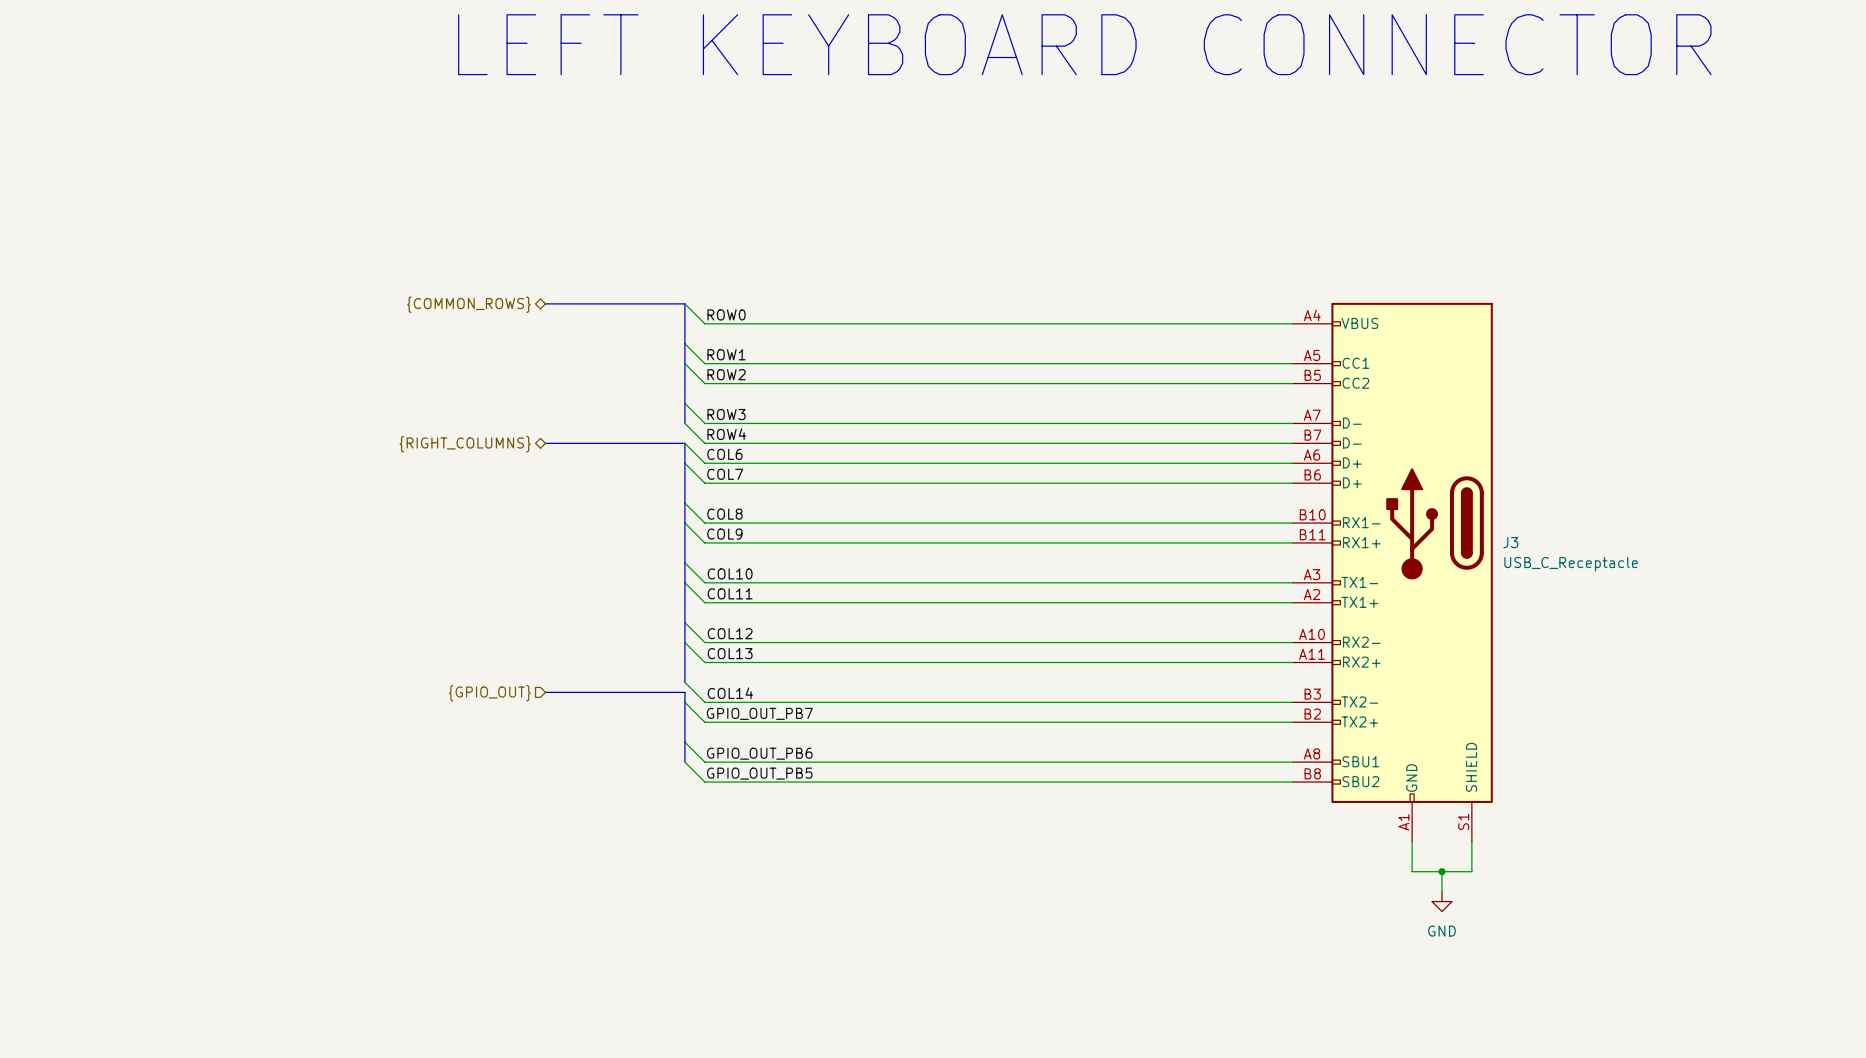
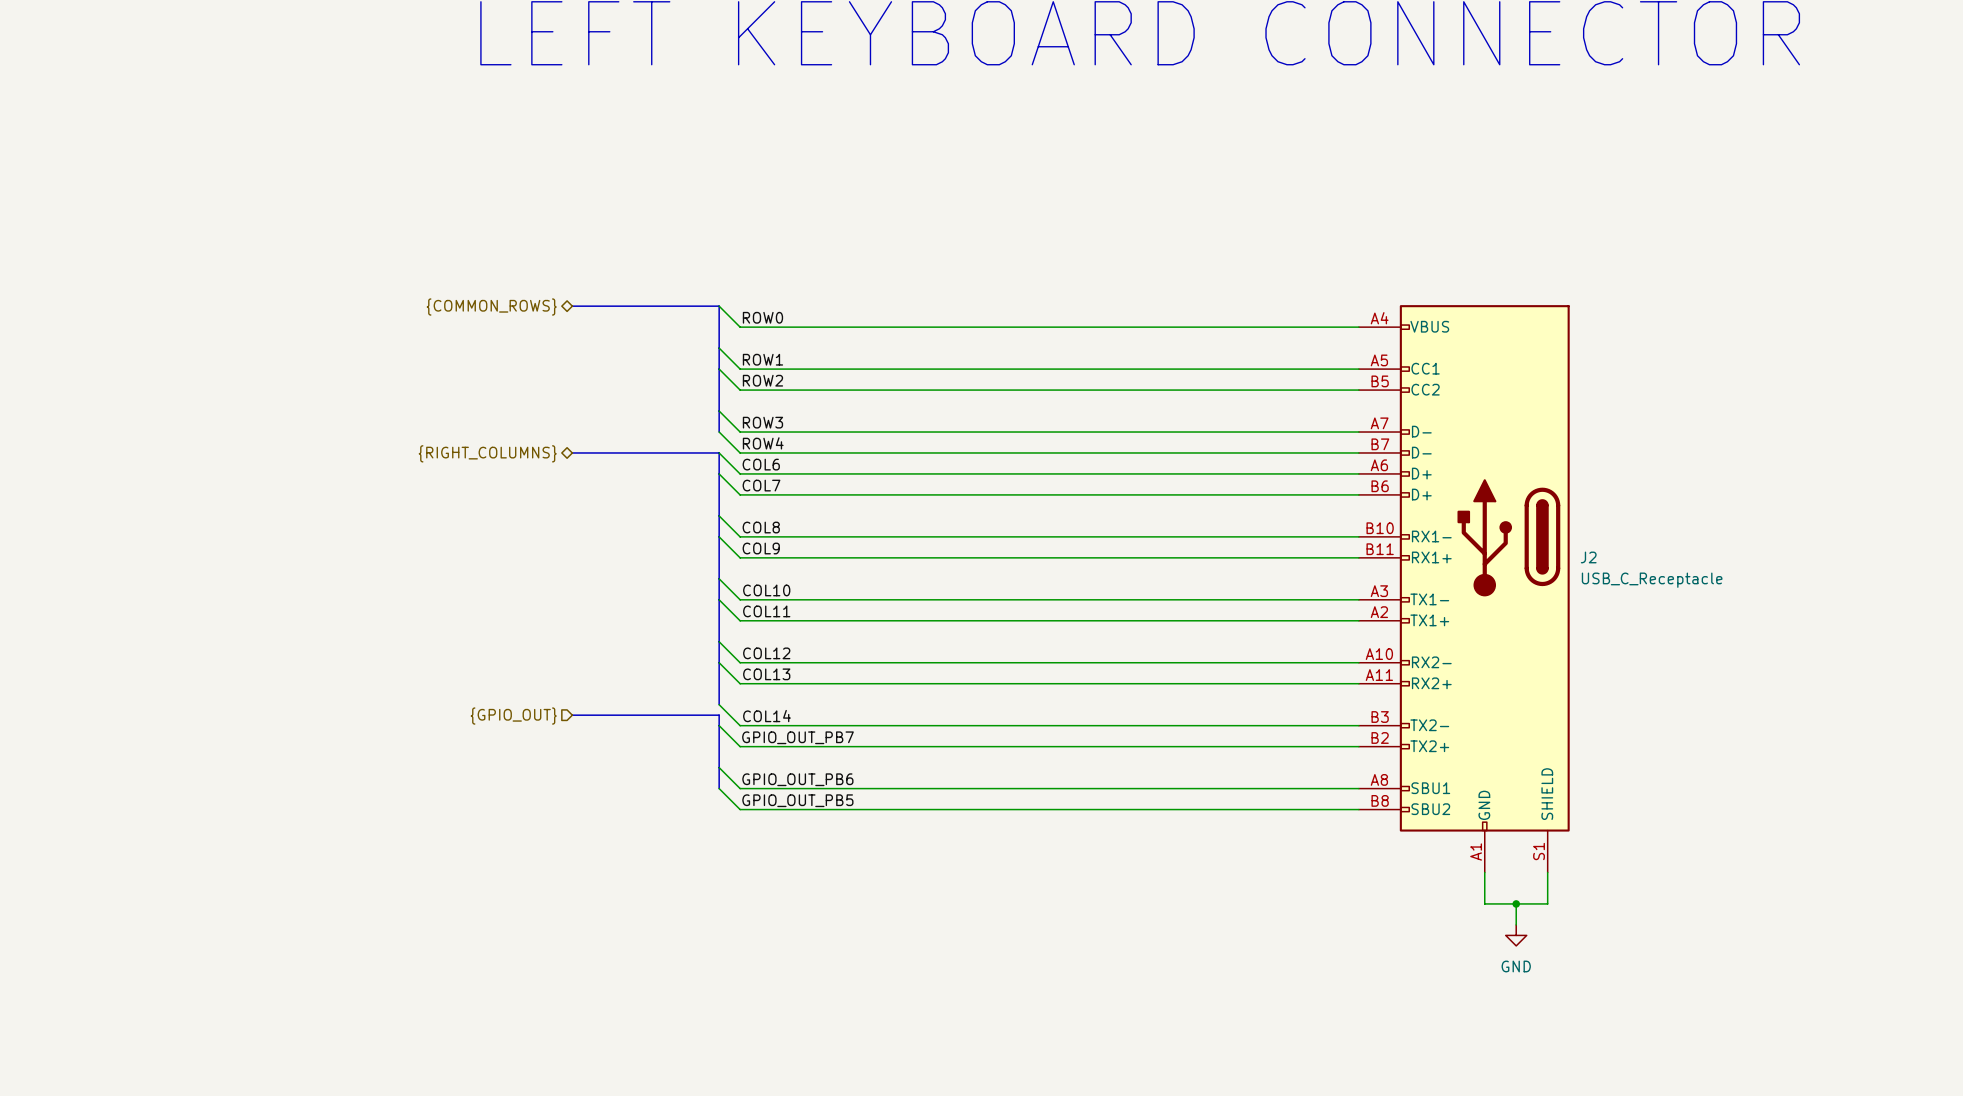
J3 name: J3 (1510, 542) -> J2 (1588, 557)

